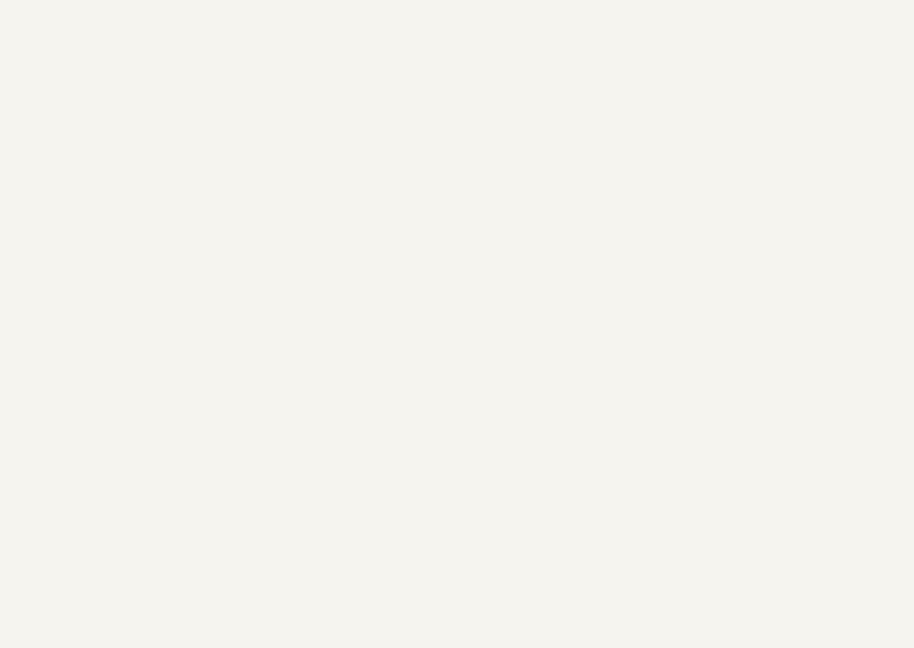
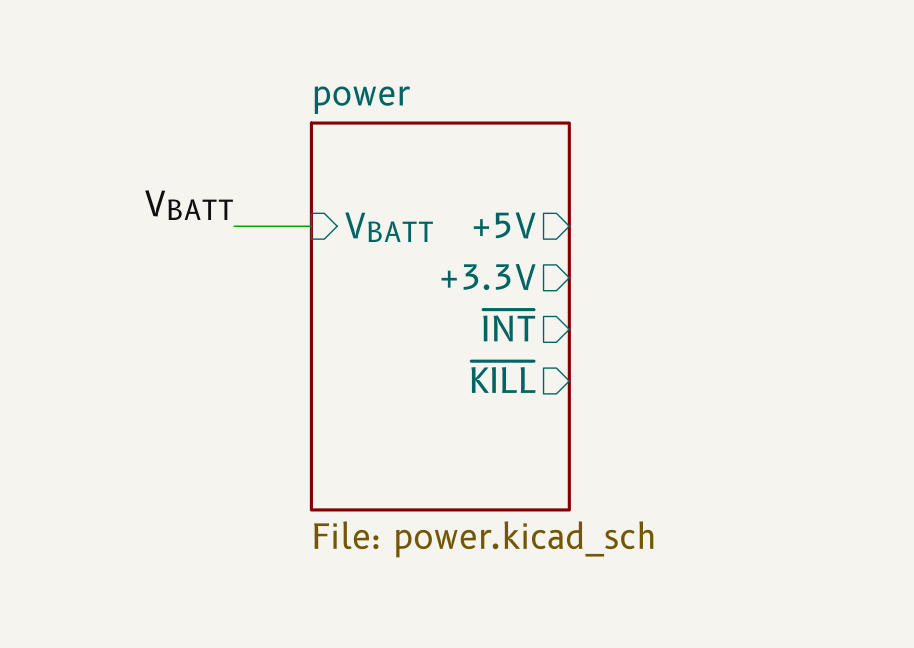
label: none -> VBATT (189, 205)
sheet pin: none -> +5V (504, 225)
wire: none -> (234, 226) (311, 226)
sheet pin: none -> VBATT (389, 227)
sheet pin: none -> +3.3V (488, 277)
sheet power: none -> File: power.kicad_sch (440, 316)
sheet pin: none -> ~{INT} (509, 325)
sheet pin: none -> ~{KILL} (503, 377)

